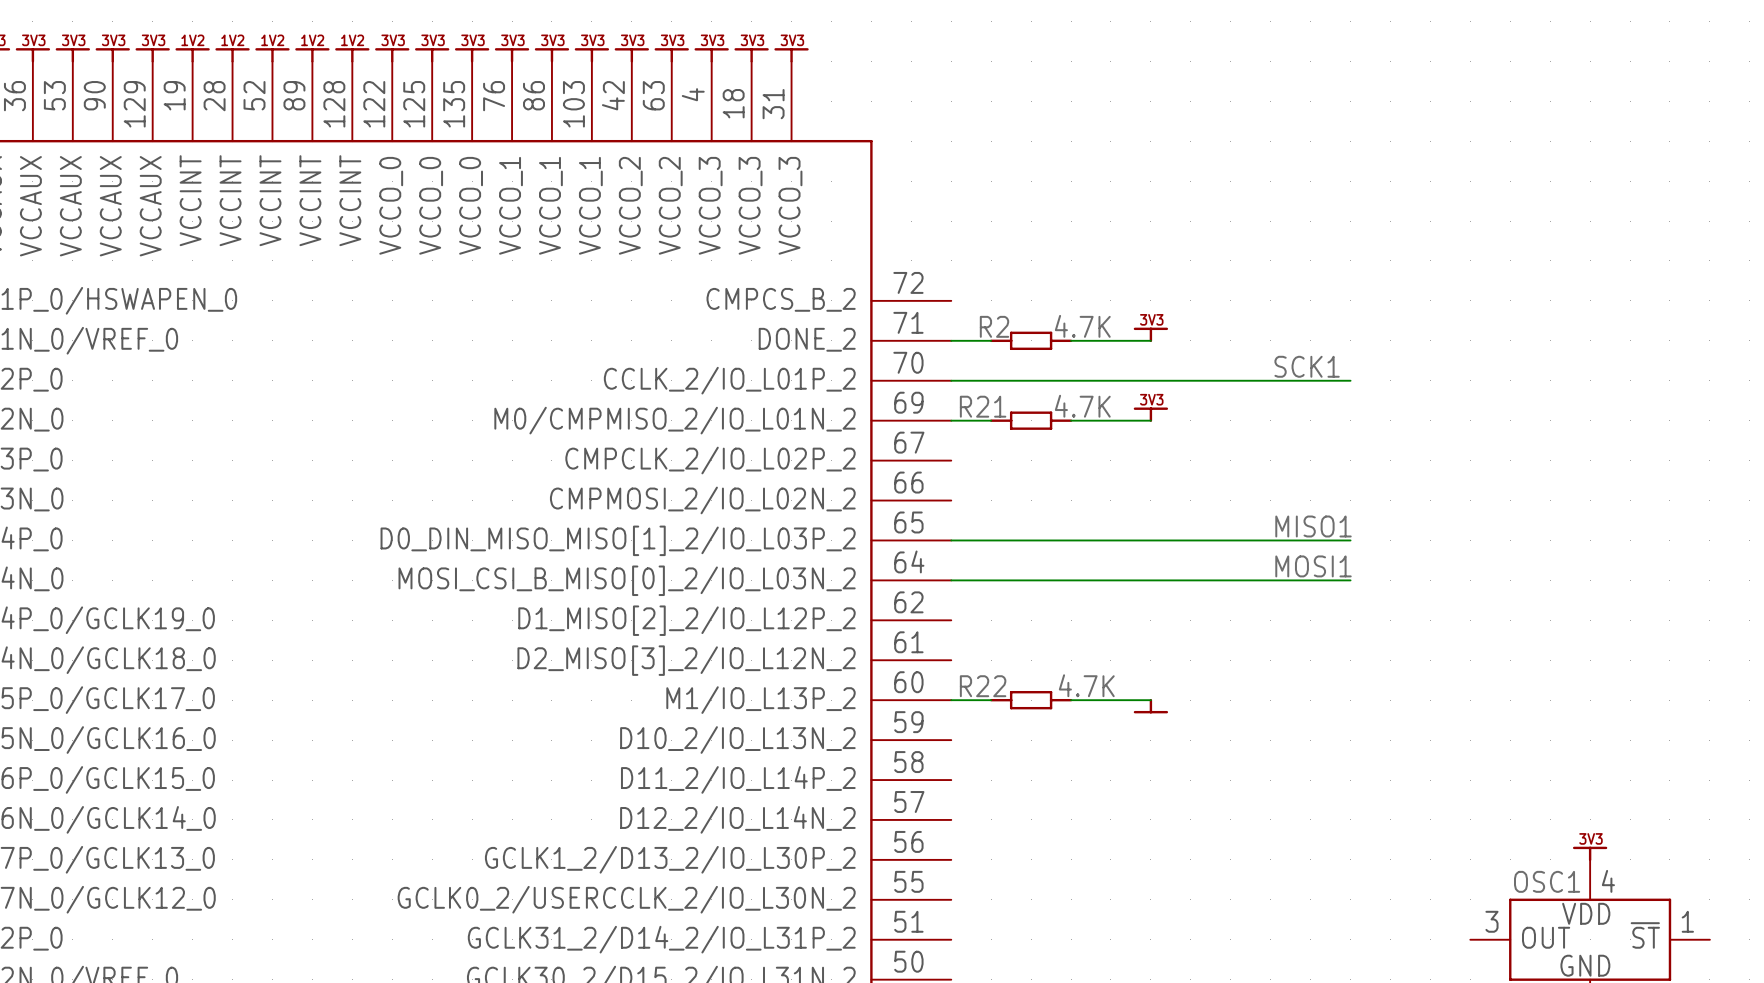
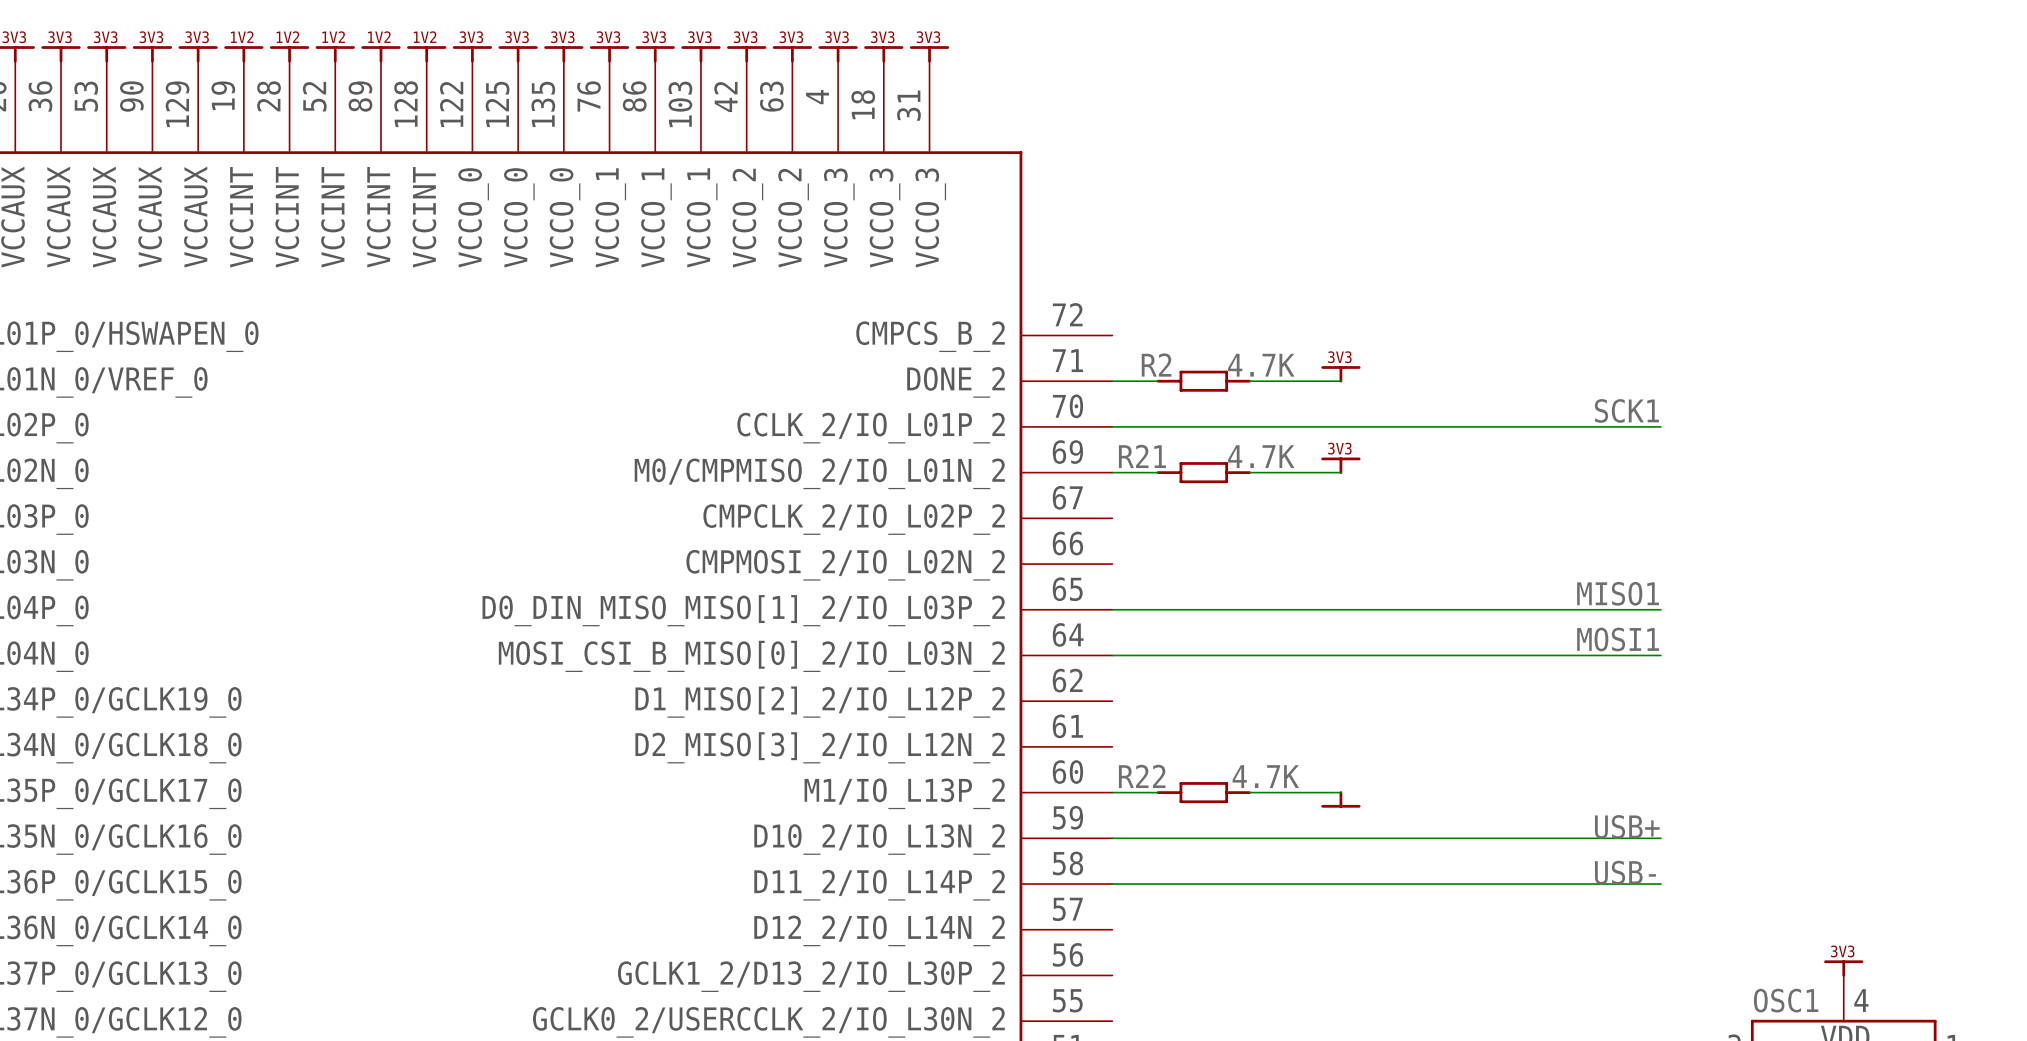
label position: SCK1 (1307, 366) -> SCK1 (1626, 410)
wire: none -> (1569, 426) (1660, 426)
label position: MISO1 (1313, 526) -> MISO1 (1618, 593)
wire: none -> (1569, 609) (1660, 609)
label position: MOSI1 (1313, 566) -> MOSI1 (1618, 639)
wire: none -> (1569, 655) (1660, 655)
label: none -> USB+ (1627, 826)
wire: none -> (1112, 838) (1660, 838)
label: none -> USB- (1625, 872)
wire: none -> (1112, 884) (1660, 884)

